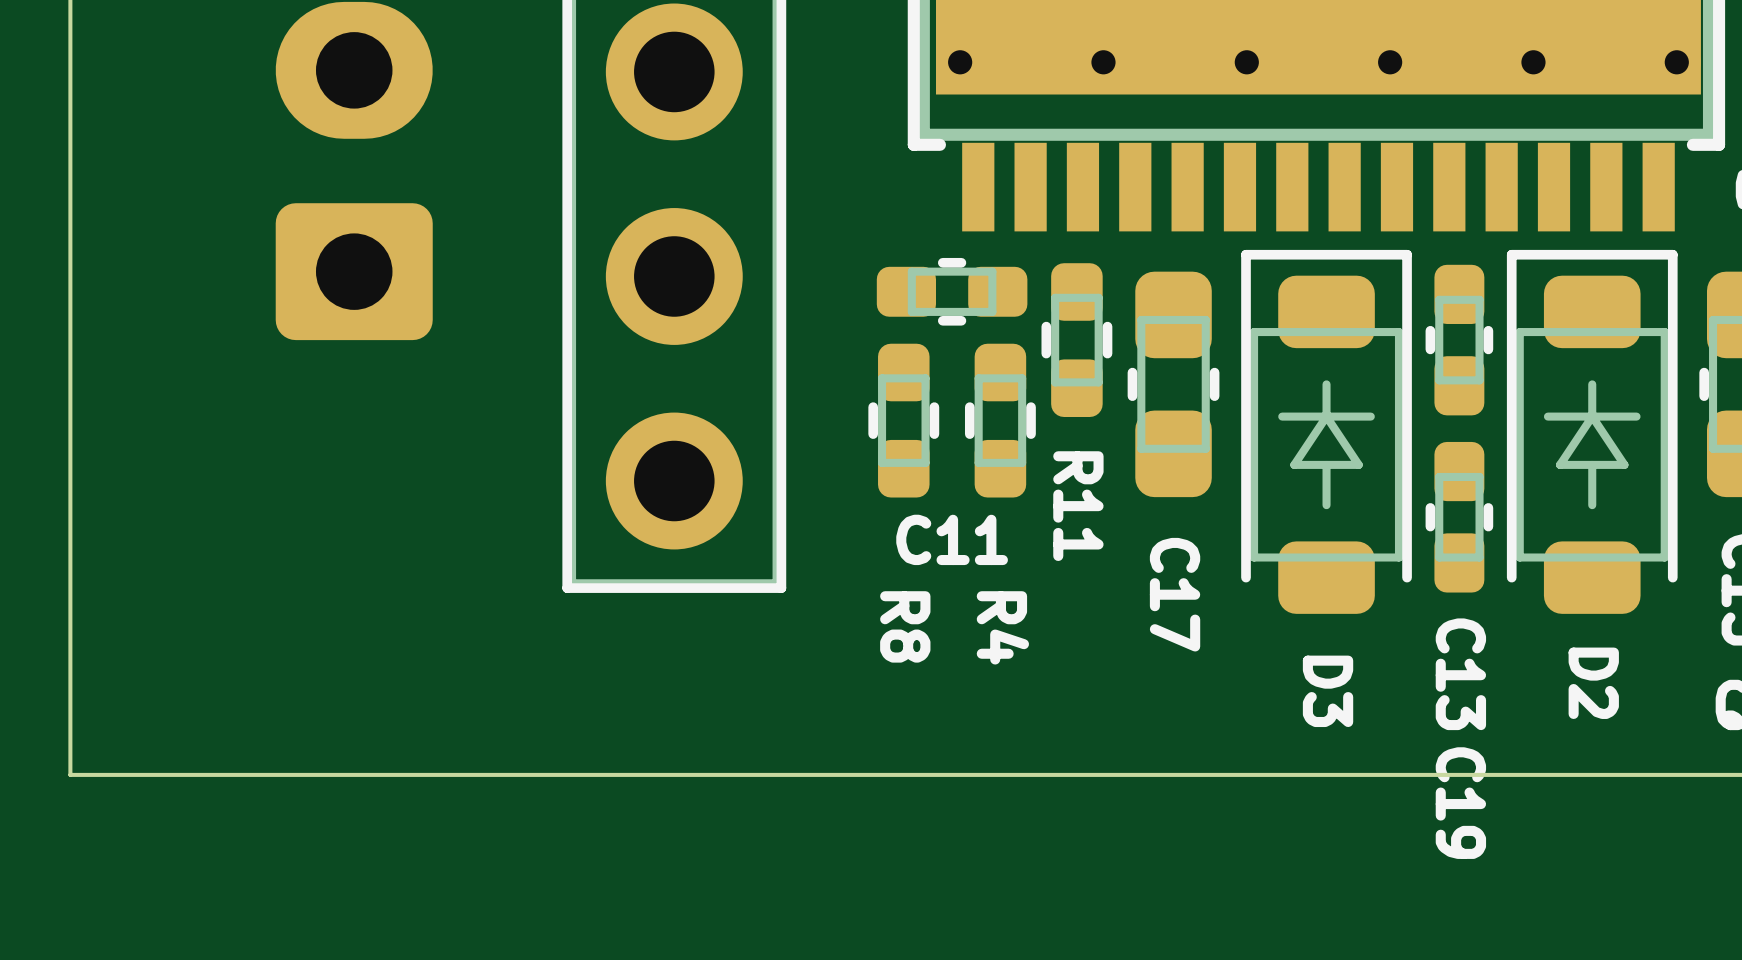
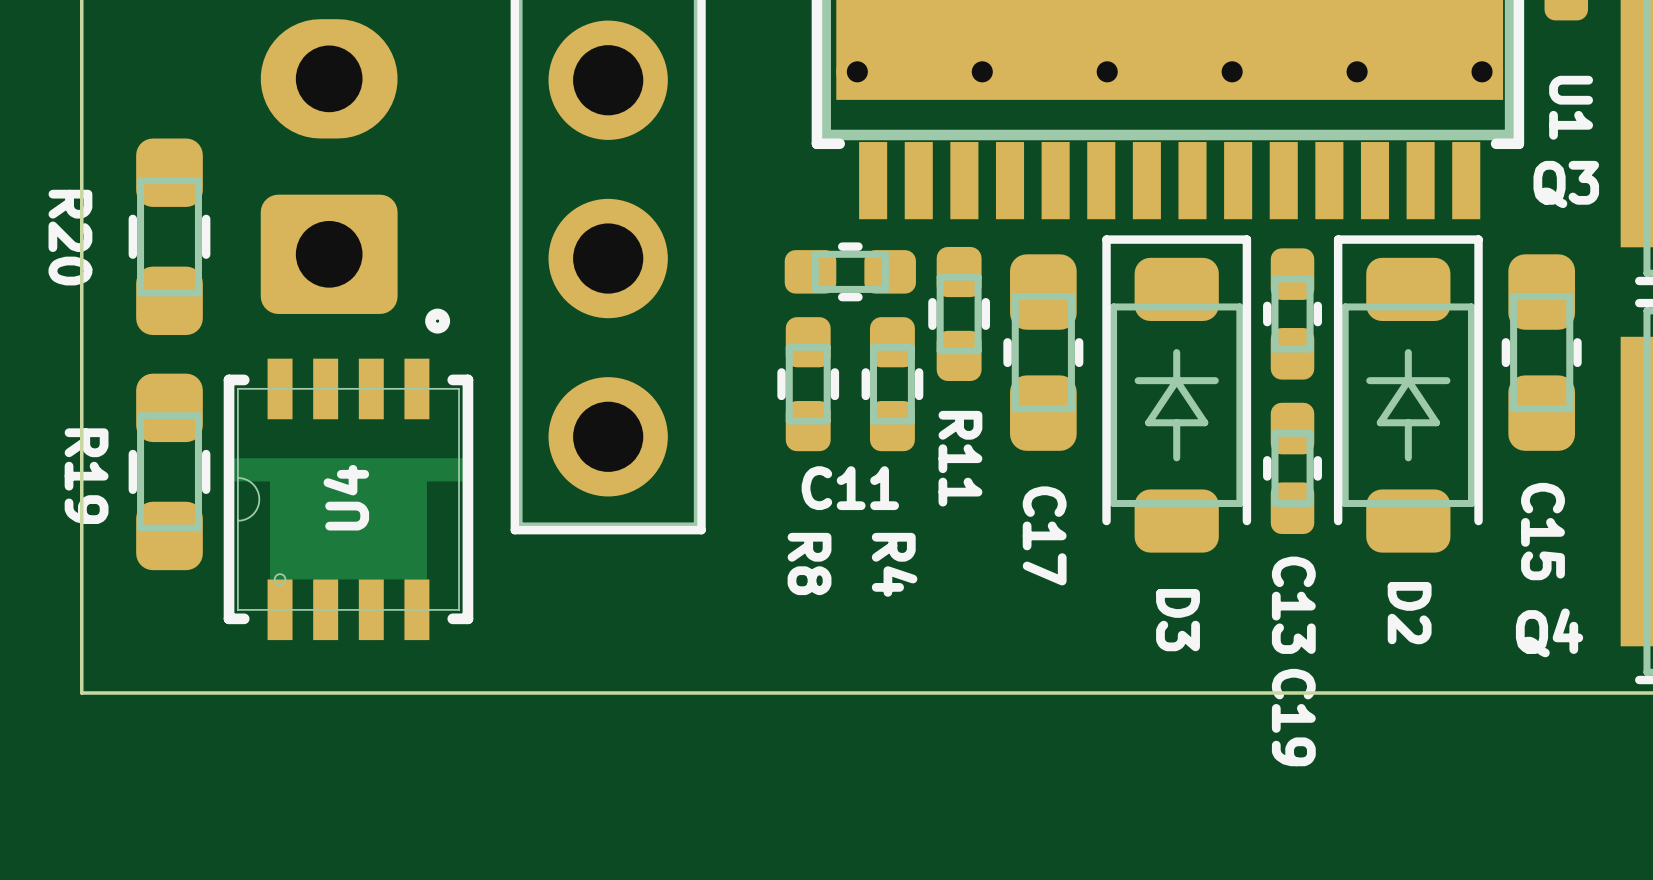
R20: none -> (169, 236)
R19: none -> (169, 471)
U4: none -> (348, 474)

